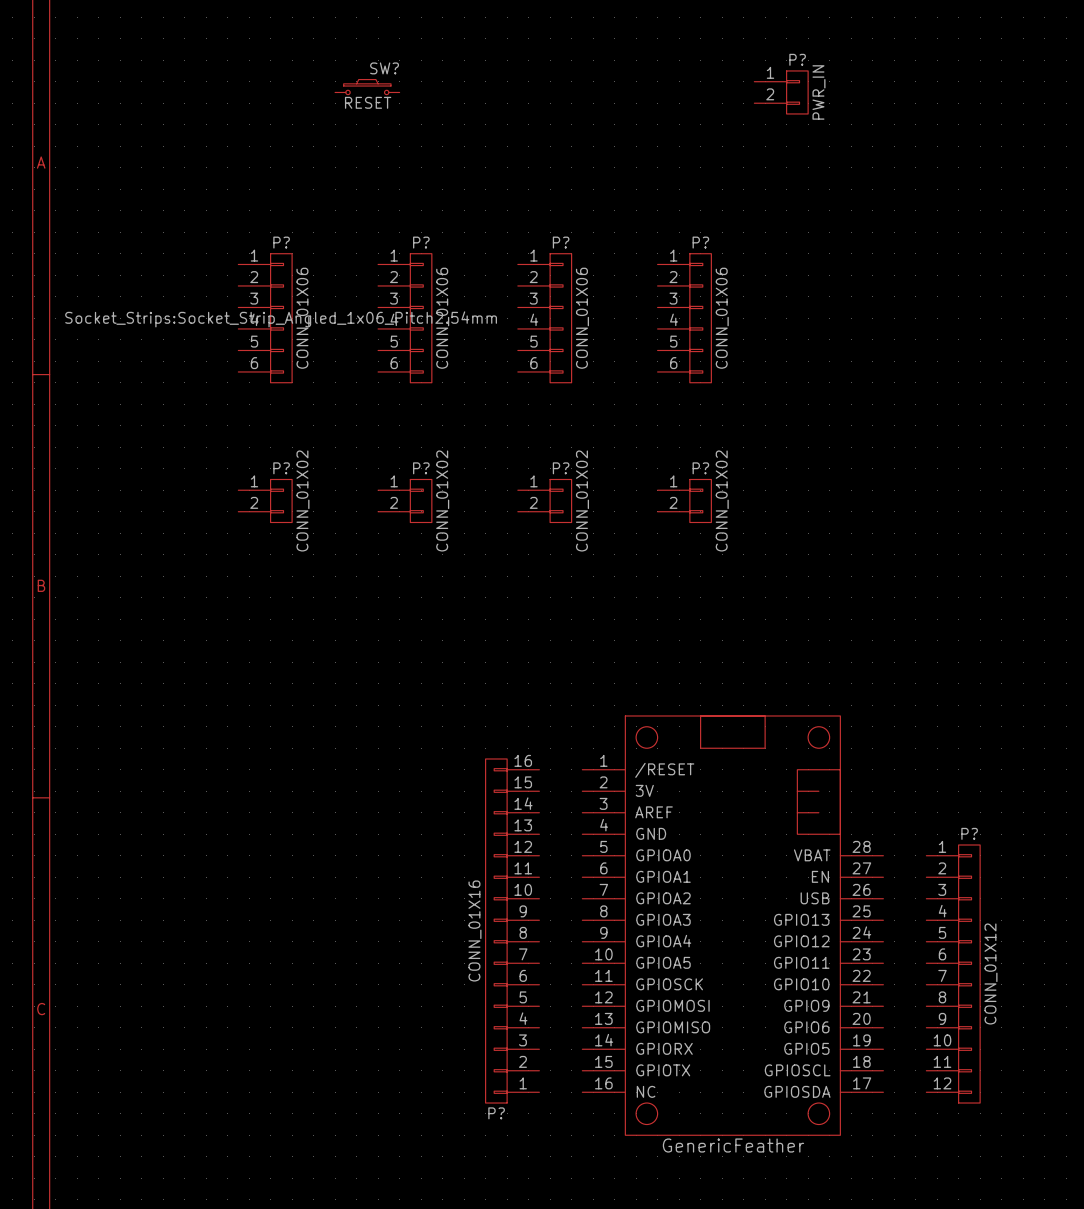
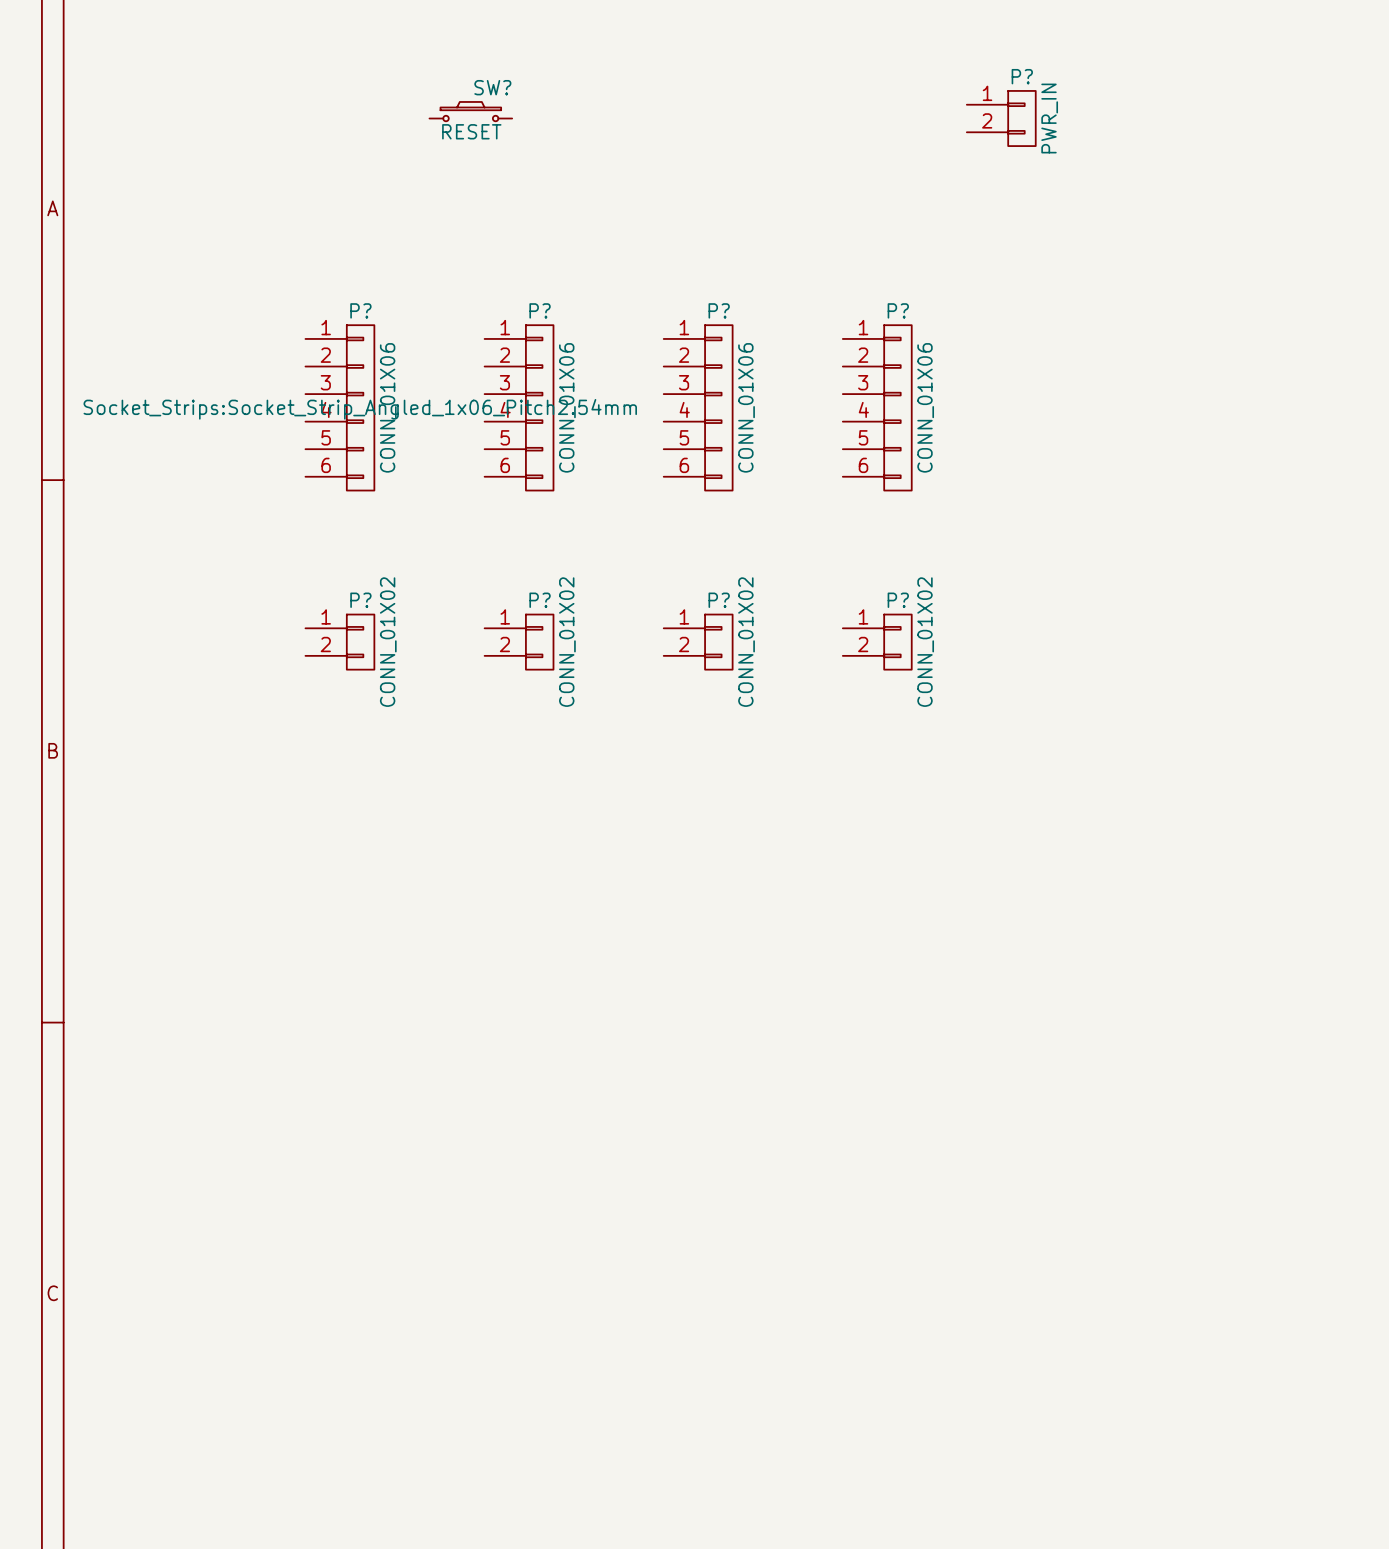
part: GenericFeather (732, 925) -> none
P?: CONN_01X16 (512, 931) -> none
P?: CONN_01X12 (953, 974) -> none

